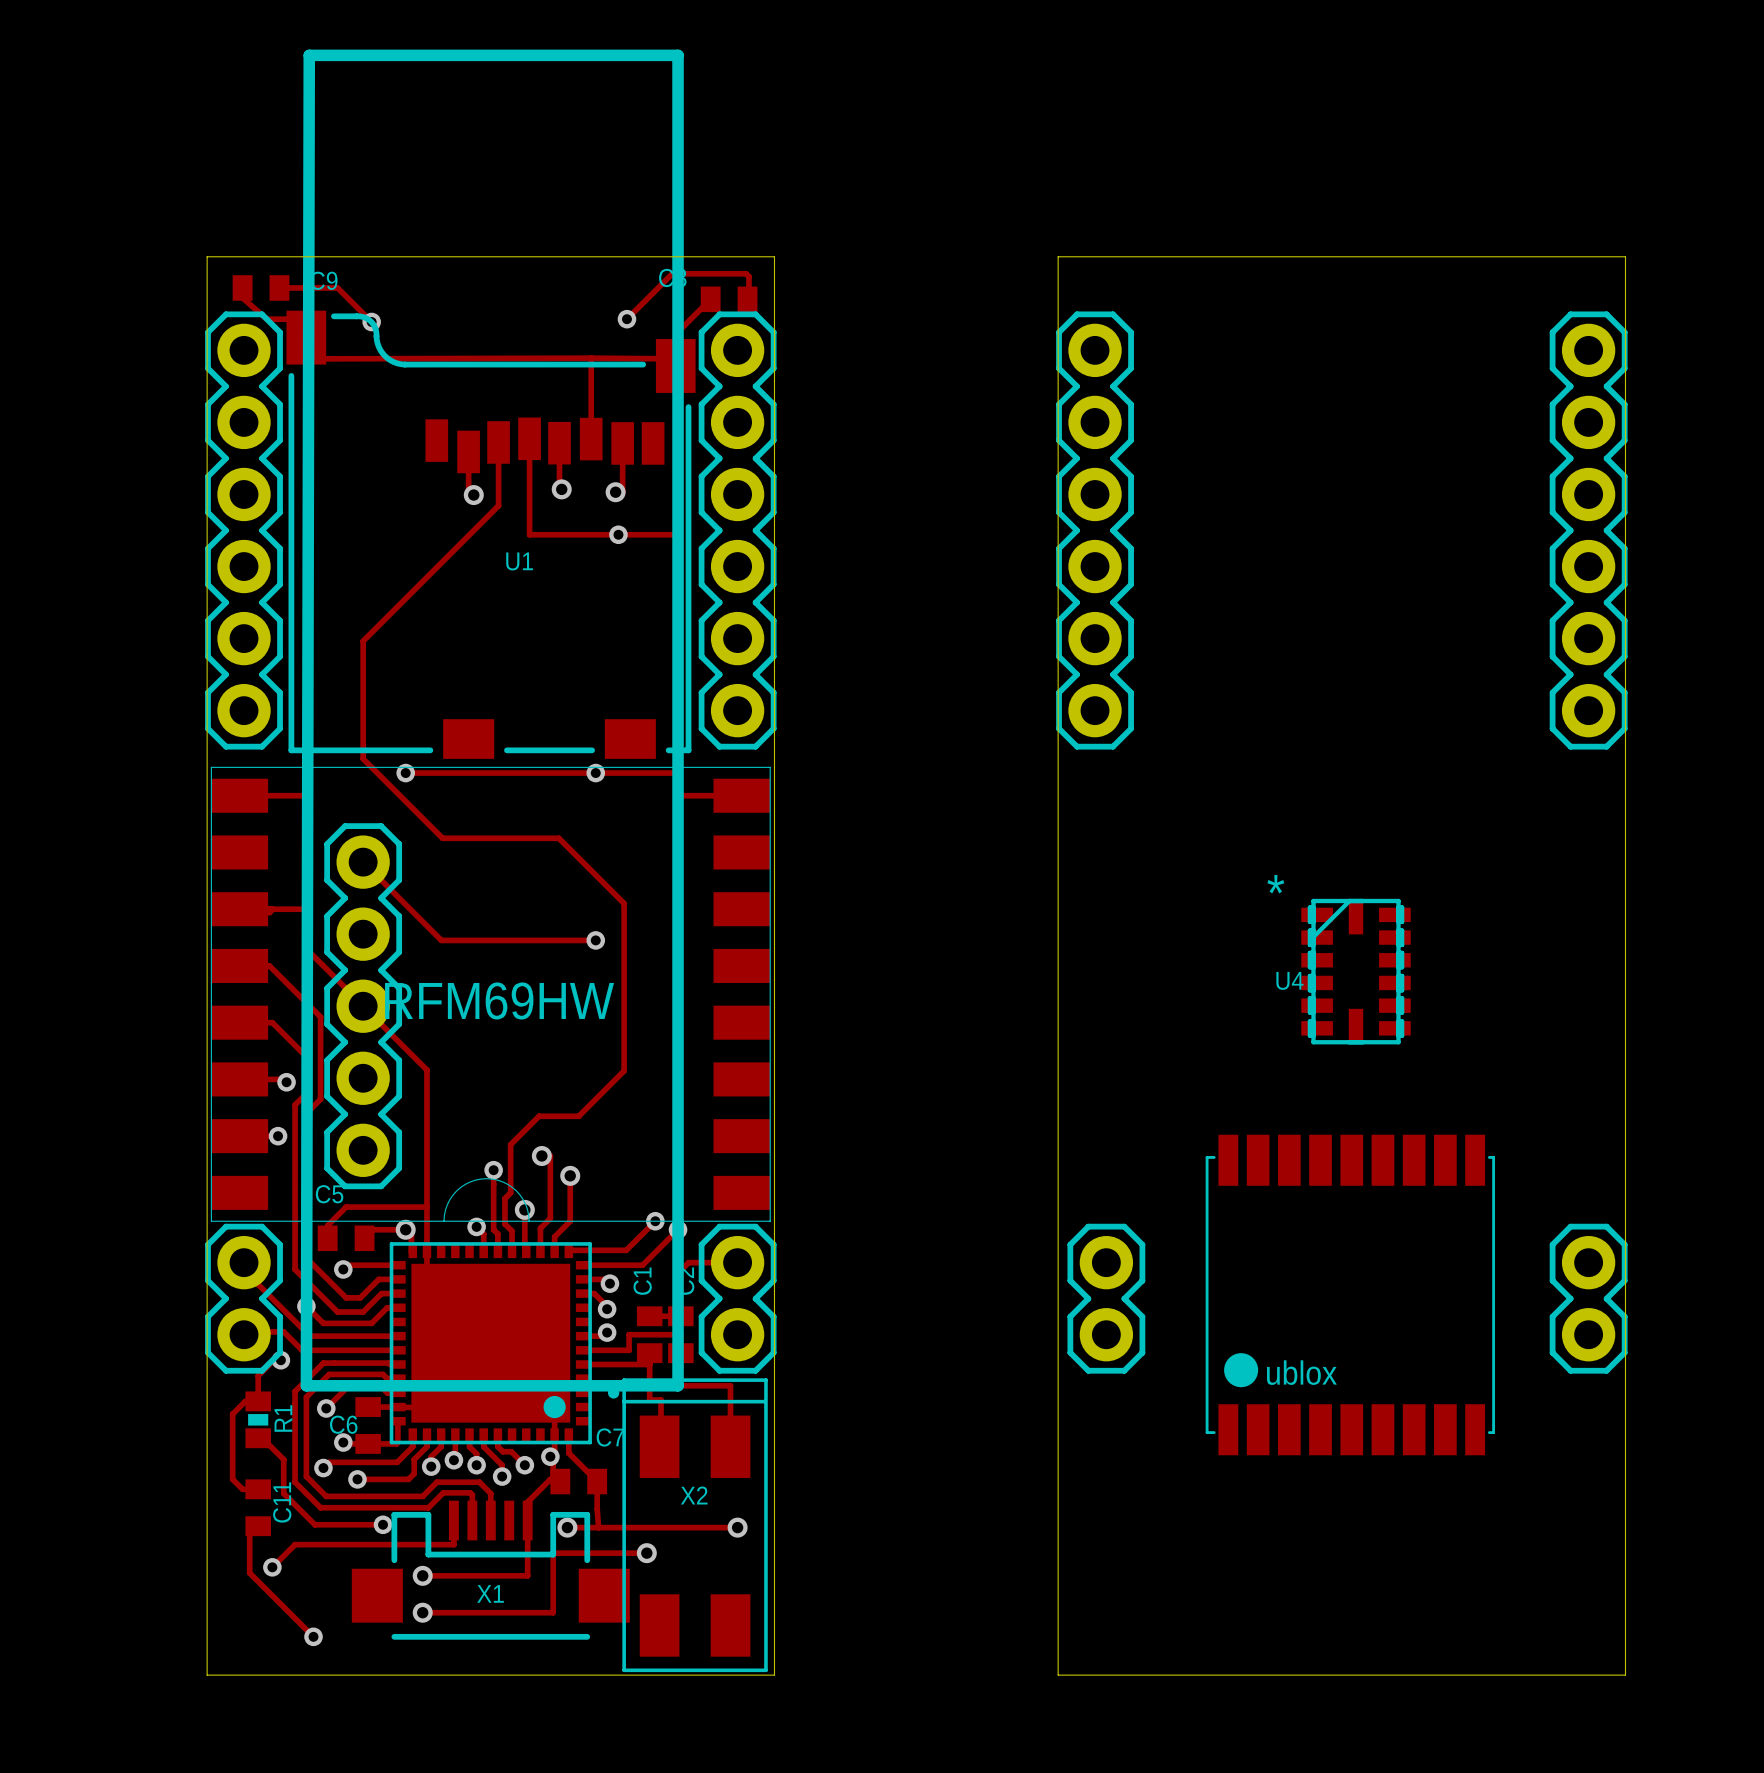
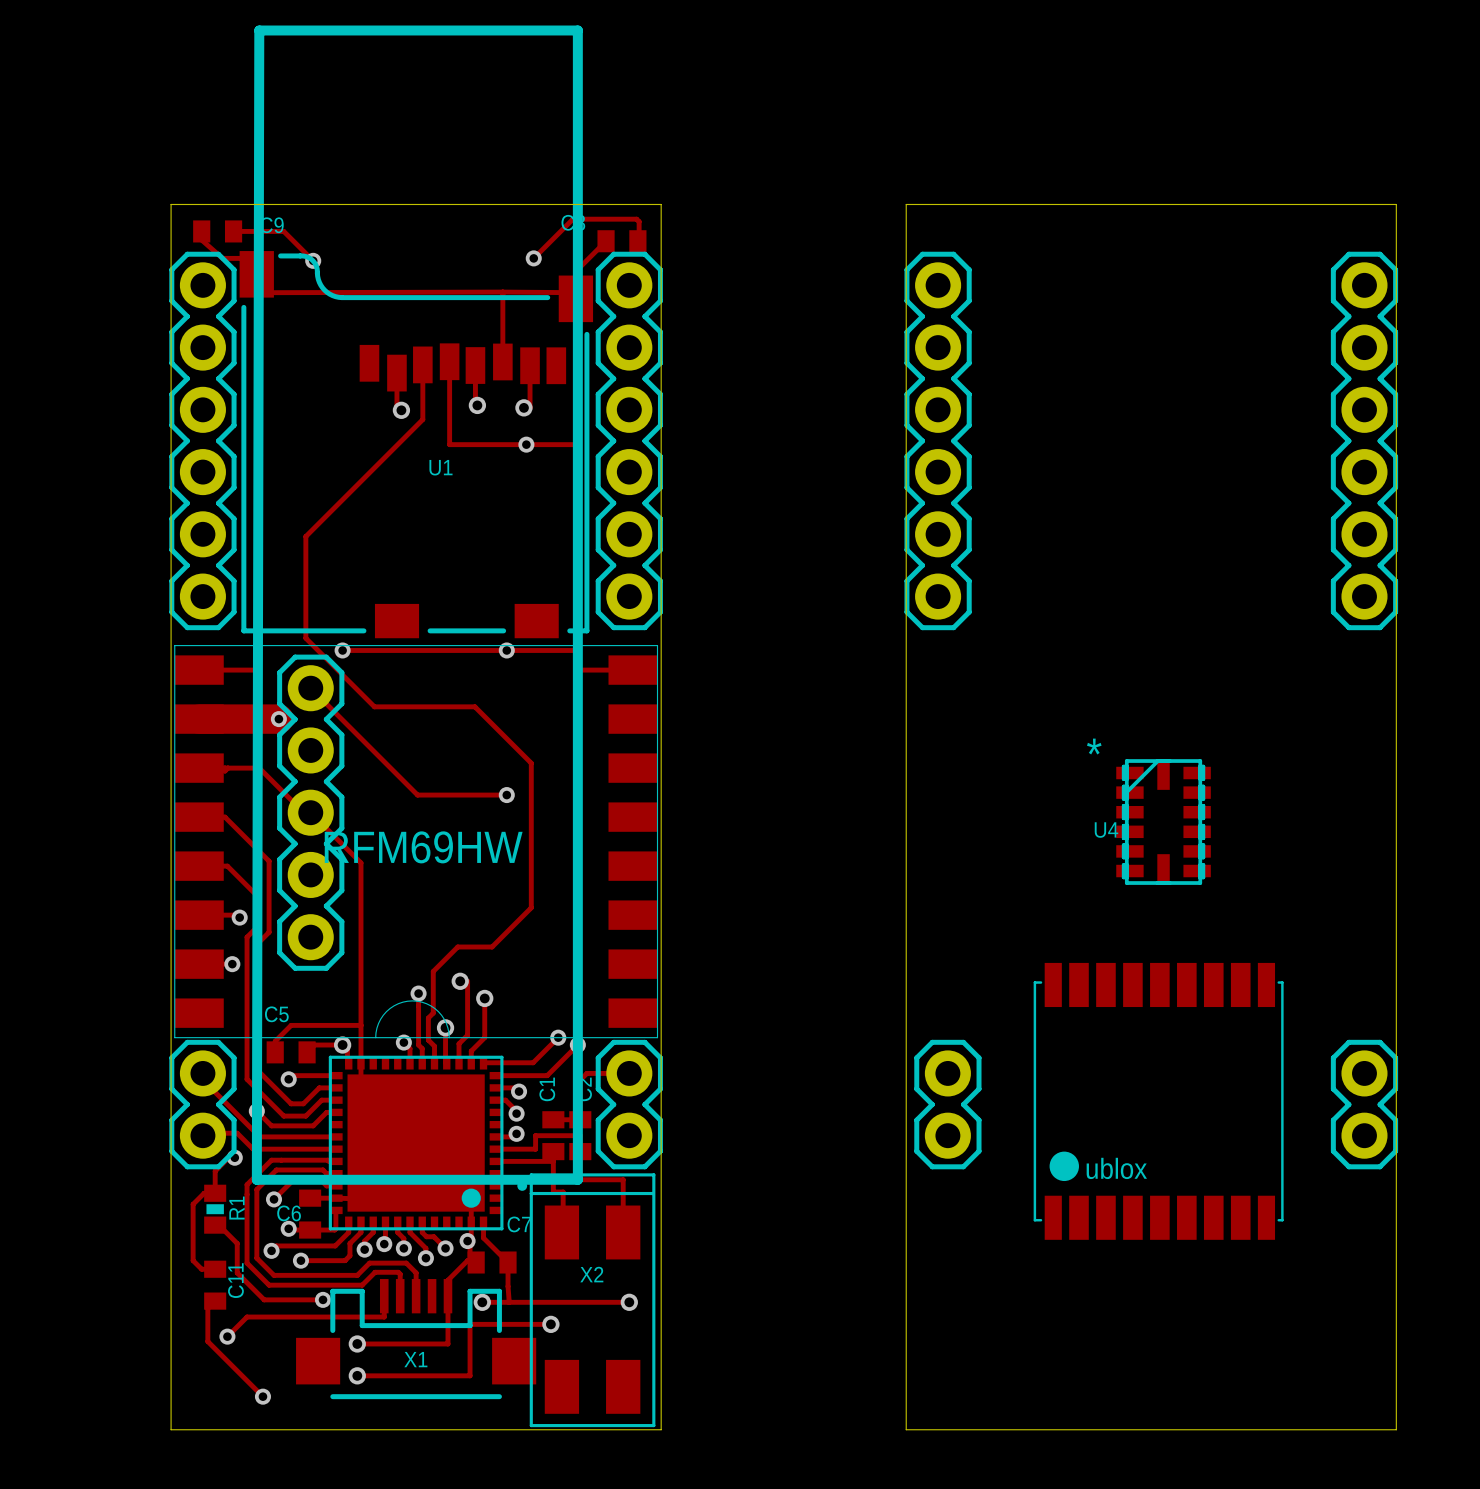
track: none -> (199, 719) (278, 719)
via: none -> (278, 719)
track: (363, 862) (441, 940) (492, 940) -> (310, 688) (417, 795)
track: (309, 909) (309, 951) (426, 1070) -> (259, 768) (303, 812) (310, 812) (360, 862) (360, 907)
part position: (363, 1006) -> (310, 812)

